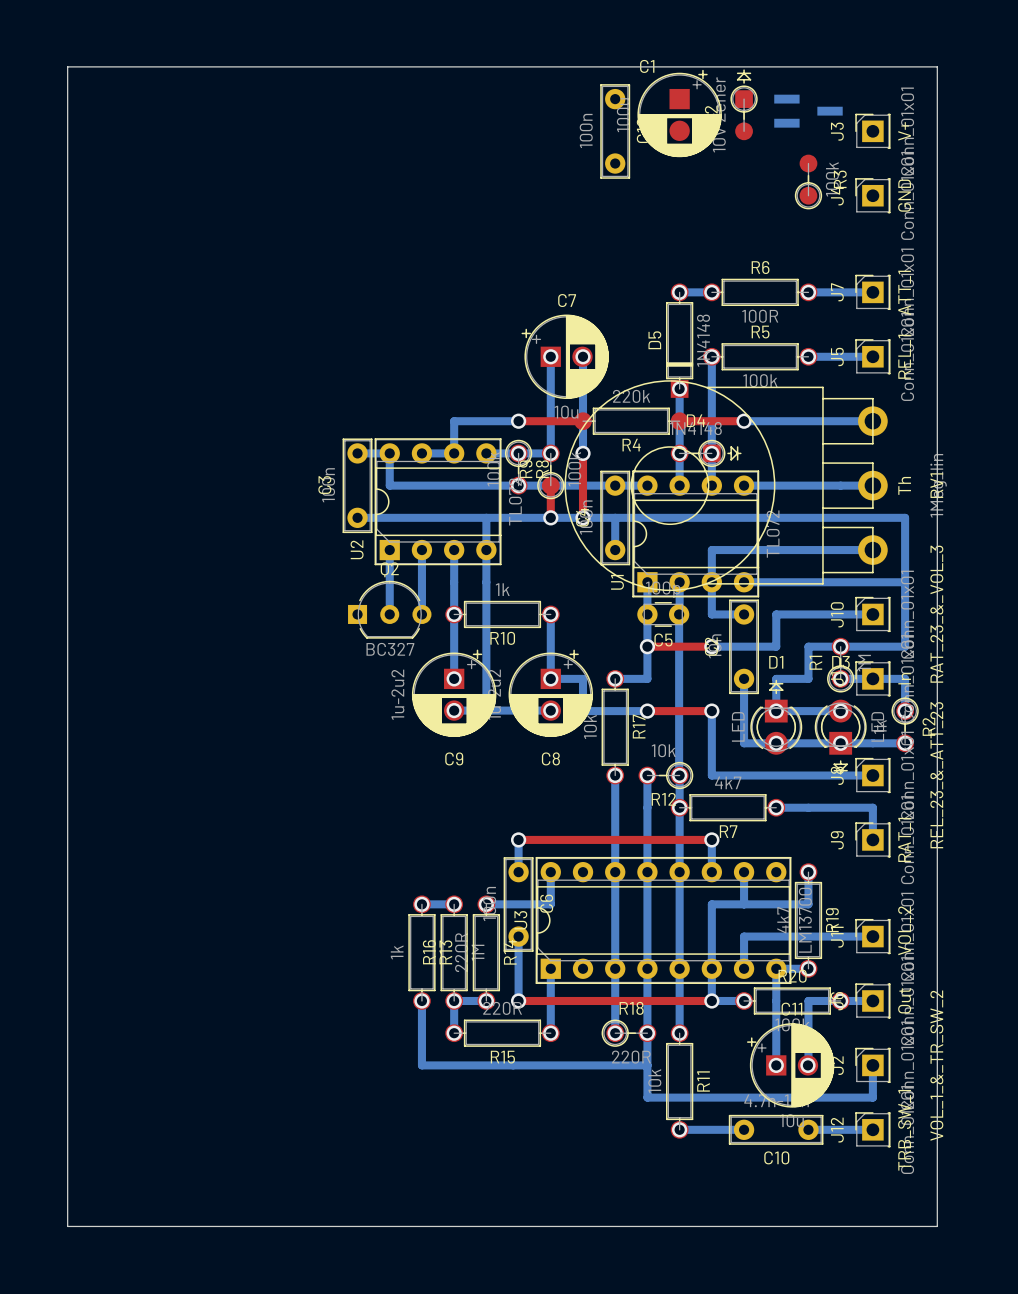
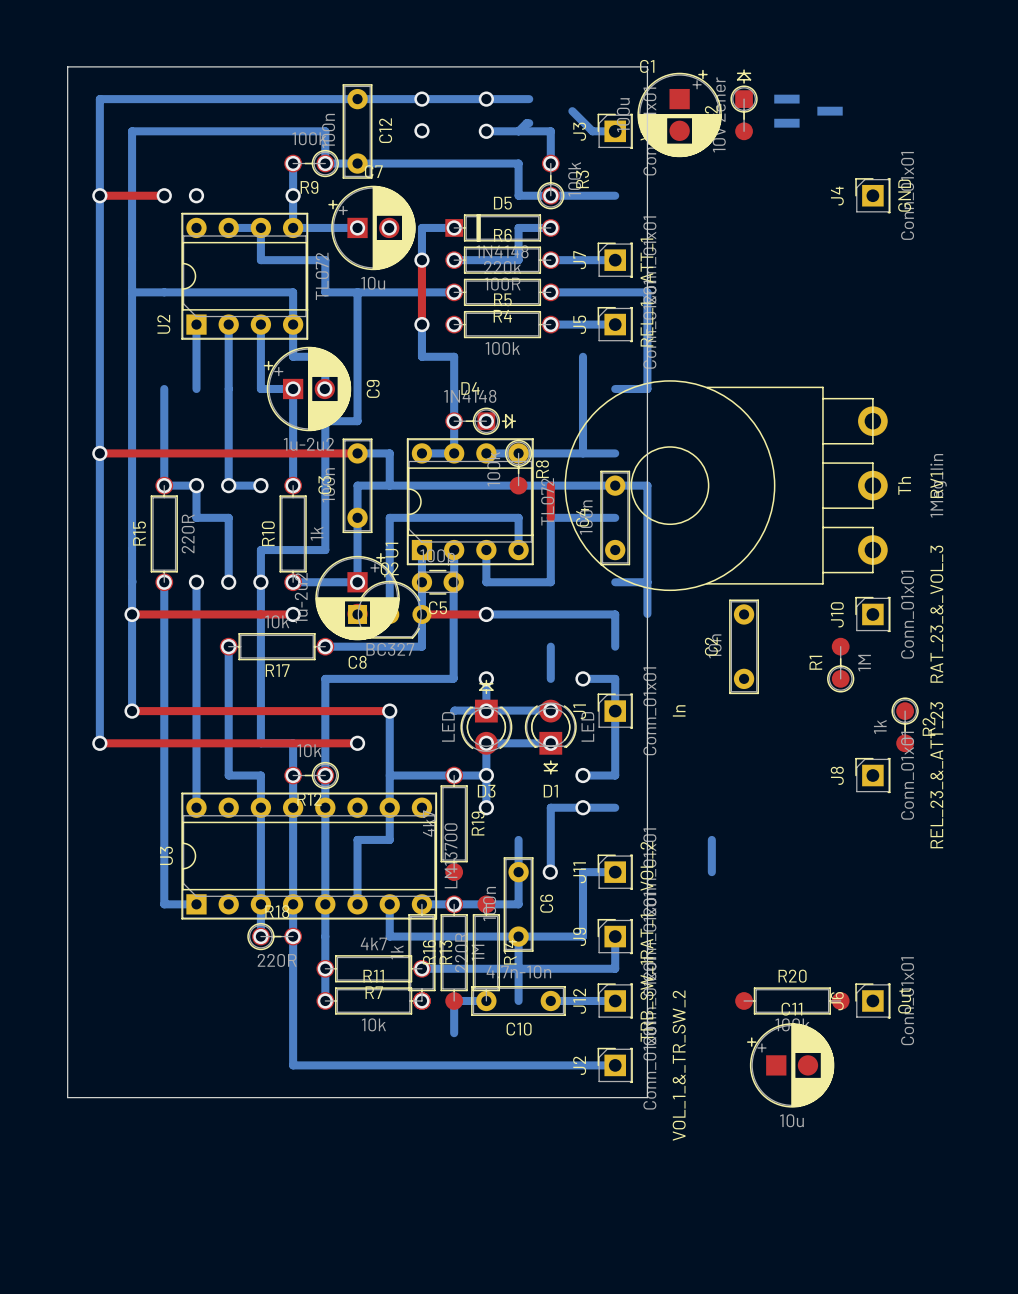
board edge: (647, 66) (937, 66) (937, 1226) (67, 1226) (67, 1097) -> (647, 66) (647, 1097) (67, 1097)
via: none -> (421, 99)
via: none -> (486, 99)
bottom track: none -> (529, 99) (99, 99) (99, 743)
bottom track: none -> (572, 111) (592, 131) (615, 131)
bottom track: none -> (529, 123) (526, 123) (518, 131)
via: none -> (421, 130)
bottom track: none -> (486, 131) (550, 131) (550, 163)
via: none -> (486, 131)
C12 position: (615, 131) -> (357, 131)
J3 position: (872, 131) -> (615, 131)
bottom track: none -> (293, 163) (293, 227) (357, 227)
via: none -> (293, 163)
via: none -> (325, 163)
via: none -> (550, 163)
R3 position: (808, 182) -> (550, 182)
top track: none -> (99, 195) (164, 195)
via: none -> (99, 195)
via: none -> (164, 195)
via: none -> (196, 195)
via: none -> (293, 195)
via: none -> (550, 195)
bottom track: none -> (615, 195) (518, 195) (518, 163) (325, 163) (325, 131) (132, 131) (132, 711)
bottom track: none -> (228, 227) (260, 227) (260, 260) (325, 260) (325, 292) (454, 292)
via: none -> (357, 227)
via: none -> (389, 227)
bottom track: none -> (454, 227) (421, 227) (421, 260)
via: none -> (454, 227)
bottom track: none -> (550, 227) (518, 227) (518, 260) (454, 260)
via: none -> (550, 227)
via: none -> (421, 260)
via: none -> (454, 260)
via: none -> (550, 260)
bottom track: none -> (132, 292) (293, 292) (293, 356) (325, 356) (324, 388)
via: none -> (454, 292)
bottom track: none -> (550, 292) (647, 292) (647, 388) (615, 388)
via: none -> (550, 292)
bottom track: (679, 292) (711, 292) -> none
via: (679, 292) -> none
via: (711, 292) -> none
R6 position: (760, 292) -> (502, 260)
bottom track: (808, 292) (872, 292) -> (550, 260) (615, 260)
via: (808, 292) -> none
J7 position: (872, 292) -> (615, 260)
bottom track: none -> (196, 324) (196, 388)
bottom track: none -> (228, 324) (228, 485) (260, 485)
bottom track: none -> (260, 324) (260, 388) (293, 388) (293, 485)
via: none -> (421, 324)
via: none -> (454, 324)
via: none -> (550, 324)
D5 rotation: 0° (679, 340) -> 90° clockwise (502, 227)
D5 position: (679, 340) -> (502, 227)
bottom track: (550, 356) (550, 453) -> (615, 453) (550, 453)
via: (550, 356) -> none
C7 position: (565, 356) -> (371, 227)
via: (583, 356) -> none
bottom track: (711, 356) (711, 485) -> none
via: (711, 356) -> none
R5 position: (760, 356) -> (502, 324)
bottom track: (808, 356) (872, 356) -> (550, 324) (615, 324)
via: (808, 356) -> none
J5 position: (872, 356) -> (615, 324)
bottom track: none -> (164, 388) (164, 485) (196, 485) (196, 517) (228, 517) (228, 582)
via: none -> (293, 388)
via: none -> (324, 388)
bottom track: (679, 388) (679, 485) -> none
via: (679, 388) -> none
bottom track: (454, 421) (518, 421) -> (454, 421) (454, 356) (421, 356) (421, 324)
via: none -> (454, 421)
via: none -> (486, 421)
top track: (518, 421) (583, 421) -> (421, 614) (486, 614)
via: (518, 421) -> none
R4 position: (631, 421) -> (502, 292)
top track: (679, 421) (744, 421) -> none
bottom track: (744, 421) (872, 421) -> none
via: (744, 421) -> none
top track: none -> (99, 453) (357, 453)
via: none -> (99, 453)
via: (518, 453) -> none
via: (550, 453) -> none
top track: (583, 453) (583, 517) -> (421, 260) (421, 324)
via: (583, 453) -> none
via: (679, 453) -> none
D4 position: (706, 453) -> (480, 421)
via: (711, 453) -> none
R9 rotation: 0° (550, 471) -> 90° counterclockwise (311, 163)
R9 position: (550, 471) -> (311, 163)
via: none -> (164, 485)
via: none -> (196, 485)
via: none -> (228, 485)
via: none -> (260, 485)
via: none -> (293, 485)
bottom track: none -> (389, 485) (357, 485) (357, 582) (293, 582)
via: (518, 485) -> none
bottom track: none -> (647, 485) (647, 582) (615, 582)
bottom track: (744, 485) (872, 485) -> none
U2 position: (438, 501) -> (244, 276)
bottom track: (357, 517) (389, 517) -> (389, 550) (389, 517)
bottom track: (486, 517) (486, 550) -> none
bottom track: (518, 517) (550, 517) -> (518, 517) (518, 550)
via: (550, 517) -> none
via: (583, 517) -> none
U1 position: (695, 533) -> (470, 501)
bottom track: (615, 550) (615, 517) (905, 517) (905, 646) (808, 646) (808, 678) (776, 678) (776, 711) (840, 711) -> none
bottom track: (872, 550) (711, 550) (711, 614) (744, 614) -> none
bottom track: (454, 581) (454, 678) -> (454, 581) (453, 678) (325, 678) (325, 1000)
bottom track: none -> (164, 582) (164, 904) (196, 904)
via: none -> (164, 582)
bottom track: none -> (196, 582) (196, 807)
via: none -> (196, 582)
via: none -> (228, 582)
via: none -> (260, 582)
via: none -> (293, 582)
via: none -> (357, 582)
bottom track: (486, 582) (486, 678) -> (486, 582) (550, 582) (550, 517)
bottom track: (679, 582) (679, 1033) -> none
bottom track: (744, 582) (905, 582) -> none
top track: none -> (132, 614) (293, 614)
via: none -> (132, 614)
via: none -> (293, 614)
bottom track: none -> (421, 614) (421, 646) (325, 646)
via: (454, 614) -> none
bottom track: none -> (486, 614) (615, 614) (615, 646)
via: none -> (486, 614)
R10 rotation: 0° (502, 614) -> 90° clockwise (293, 533)
R10 position: (502, 614) -> (293, 533)
bottom track: (550, 614) (550, 646) -> none
via: (550, 614) -> none
bottom track: (647, 614) (647, 678) (615, 678) -> none
C5 position: (663, 614) -> (437, 582)
bottom track: (872, 614) (776, 614) (776, 646) (711, 646) -> none
bottom track: none -> (228, 646) (228, 775) (260, 775) (260, 936)
via: none -> (228, 646)
via: none -> (325, 646)
top track: (647, 646) (711, 646) -> none
via: (647, 646) -> none
via: (711, 646) -> none
via: (840, 646) -> none
via: (454, 678) -> none
via: none -> (486, 678)
bottom track: (550, 678) (583, 678) (583, 711) (647, 711) -> none
via: (550, 678) -> none
bottom track: none -> (583, 678) (615, 678) (615, 775) (583, 775)
via: none -> (583, 678)
via: (615, 678) -> none
bottom track: (744, 678) (744, 743) (905, 743) -> none
bottom track: (840, 678) (905, 678) (905, 711) -> none
via: (840, 678) -> none
J1 position: (872, 678) -> (615, 711)
J1 text position: In (904, 678) -> In (679, 710)
C9 rotation: 0° (454, 693) -> 90° counterclockwise (307, 388)
C9 position: (454, 693) -> (307, 388)
C8 position: (550, 693) -> (357, 596)
via: (454, 710) -> none
top track: none -> (132, 711) (389, 711)
via: none -> (132, 711)
bottom track: none -> (389, 711) (389, 839) (357, 839) (357, 904)
via: none -> (389, 711)
via: none -> (486, 711)
top track: (647, 711) (711, 711) -> none
via: (647, 711) -> none
bottom track: (711, 711) (711, 775) (872, 775) -> none
via: (711, 711) -> none
via: (776, 711) -> none
via: (840, 711) -> none
via: (905, 711) -> none
D1 rotation: 0° (776, 717) -> 180° (550, 737)
D1 position: (776, 717) -> (550, 737)
R17 rotation: 0° (615, 727) -> 90° clockwise (277, 646)
R17 position: (615, 727) -> (277, 646)
D3 rotation: 0° (840, 737) -> 180° (486, 717)
D3 position: (840, 737) -> (486, 717)
top track: none -> (99, 743) (357, 743)
via: none -> (99, 743)
via: none -> (357, 743)
via: none -> (486, 743)
bottom track: none -> (550, 743) (486, 743) (486, 807)
via: none -> (550, 743)
via: (776, 743) -> none
via: (840, 743) -> none
via: (905, 743) -> none
via: none -> (293, 775)
via: none -> (325, 775)
bottom track: none -> (389, 775) (486, 775)
via: none -> (454, 775)
via: none -> (486, 775)
via: none -> (583, 775)
bottom track: (615, 775) (615, 936) -> none
via: (615, 775) -> none
bottom track: (647, 775) (647, 1097) (872, 1097) (872, 1065) -> none
via: (647, 775) -> none
R12 position: (665, 775) -> (311, 775)
via: (679, 775) -> none
via: none -> (486, 807)
via: none -> (583, 807)
bottom track: none -> (615, 807) (550, 807) (550, 872)
via: (679, 807) -> none
R7 position: (727, 807) -> (373, 968)
bottom track: (776, 807) (872, 807) (872, 839) -> none
via: (776, 807) -> none
top track: (518, 839) (711, 839) -> none
via: (518, 839) -> none
via: (711, 839) -> none
J9 position: (872, 839) -> (615, 936)
bottom track: (550, 872) (550, 904) (518, 904) -> (518, 872) (518, 904)
via: none -> (550, 872)
bottom track: none -> (615, 872) (583, 872) (583, 936) (389, 936) (389, 904)
bottom track: (744, 872) (744, 904) -> none
bottom track: (808, 872) (808, 904) (711, 904) (711, 1000) (744, 1000) -> none
via: (808, 872) -> none
via: (421, 904) -> none
via: (486, 904) -> none
U3 position: (663, 920) -> (309, 856)
R19 position: (808, 920) -> (454, 823)
via: none -> (260, 936)
via: none -> (293, 936)
bottom track: (872, 936) (744, 936) (744, 968) -> none
J11 position: (872, 936) -> (615, 872)
via: none -> (325, 968)
via: none -> (421, 968)
bottom track: (550, 968) (550, 1033) -> none
bottom track: (615, 968) (615, 1033) -> (615, 968) (421, 968)
bottom track: (808, 968) (776, 968) (776, 1065) -> none
via: (808, 968) -> none
via: none -> (325, 1000)
bottom track: (421, 1000) (421, 1065) -> (357, 292) (357, 421) (325, 421) (325, 550) (260, 550) (260, 743) (293, 743) (293, 1065) (421, 1065)
via: (454, 1000) -> none
via: (486, 1000) -> none
top track: (518, 1000) (711, 1000) -> none
via: (518, 1000) -> none
via: (711, 1000) -> none
via: (744, 1000) -> none
via: (840, 1000) -> none
bottom track: (872, 1000) (808, 1000) (807, 1065) -> none
via: (454, 1033) -> none
R15 rotation: 0° (502, 1033) -> 90° clockwise (164, 533)
R15 position: (502, 1033) -> (164, 533)
via: (550, 1033) -> none
via: (615, 1033) -> none
R18 position: (628, 1033) -> (274, 936)
via: (647, 1033) -> none
via: (679, 1033) -> none
bottom track: (615, 1065) (647, 1065) -> (454, 904) (486, 904)
via: (776, 1065) -> none
via: (807, 1065) -> none
J2 position: (872, 1065) -> (615, 1065)
R11 rotation: 0° (679, 1081) -> 90° counterclockwise (373, 1000)
R11 position: (679, 1081) -> (373, 1000)
bottom track: (679, 1129) (744, 1129) -> (550, 1000) (615, 1000)
via: (679, 1129) -> none
C10 position: (776, 1129) -> (518, 1000)
bottom track: (808, 1129) (872, 1129) -> none
J12 position: (872, 1129) -> (615, 1000)

